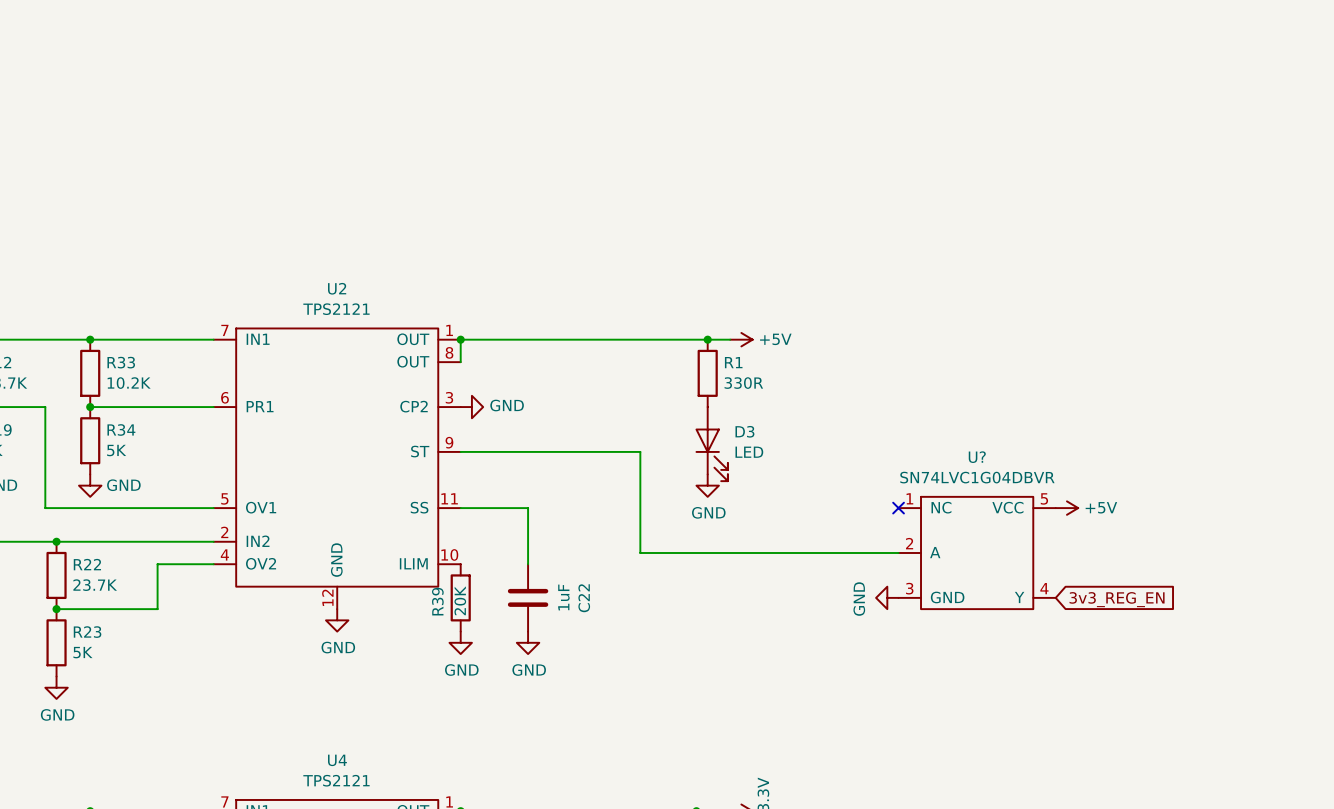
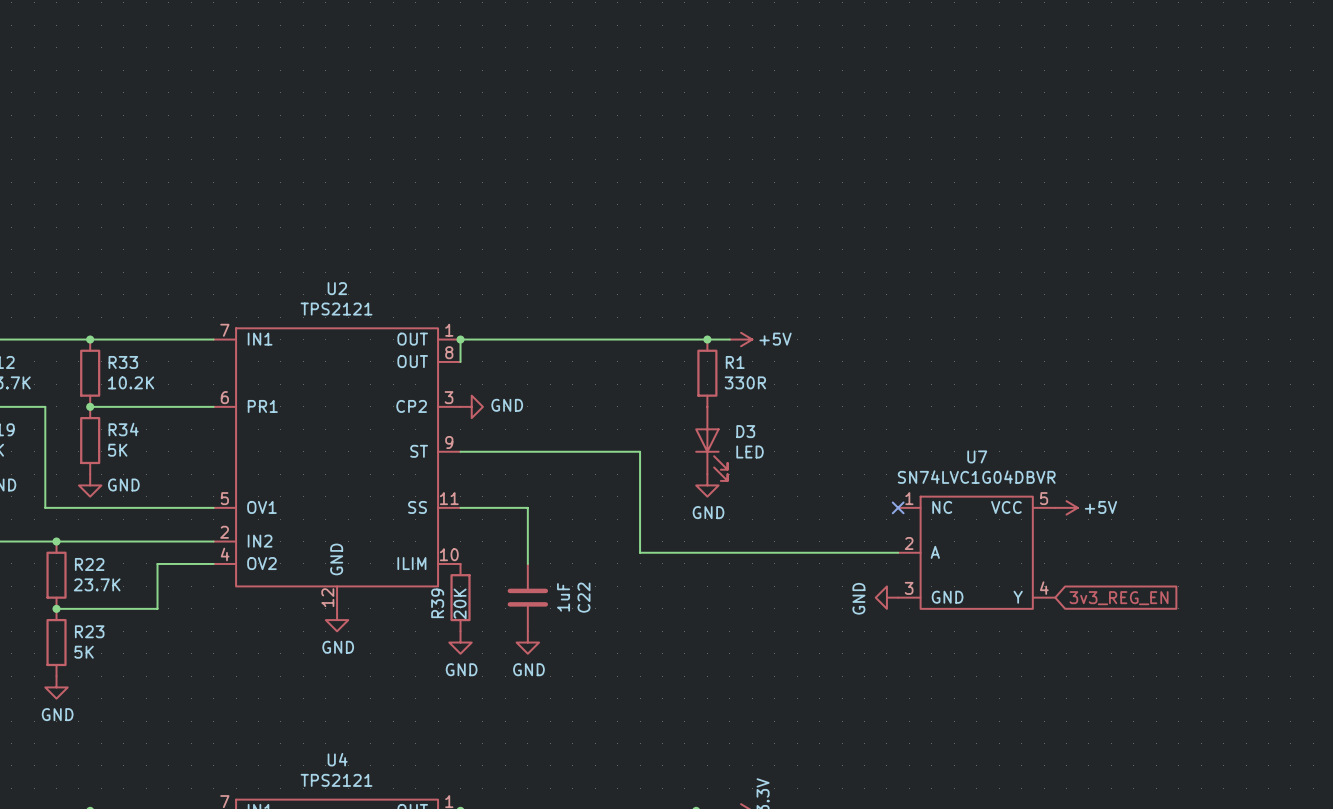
U? name: U? (977, 457) -> U7 (977, 456)

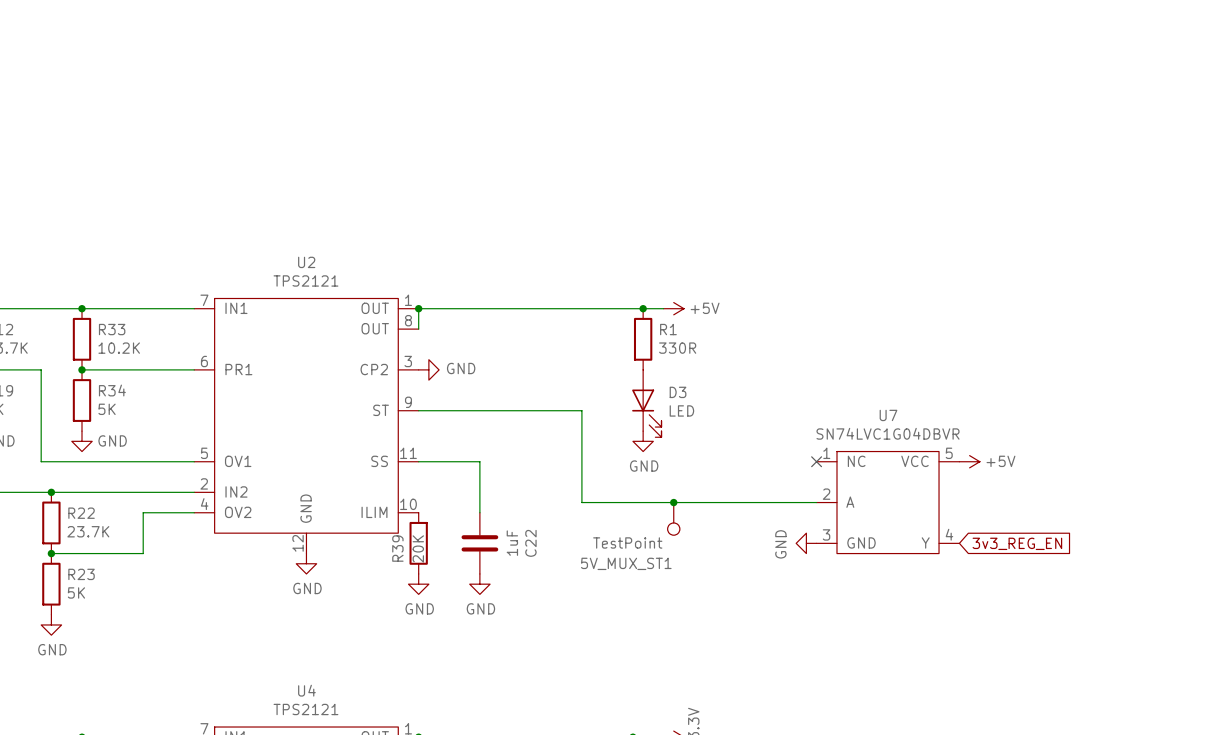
junction: none -> (673, 502)
5V_MUX_ST1: none -> TestPoint (673, 518)

